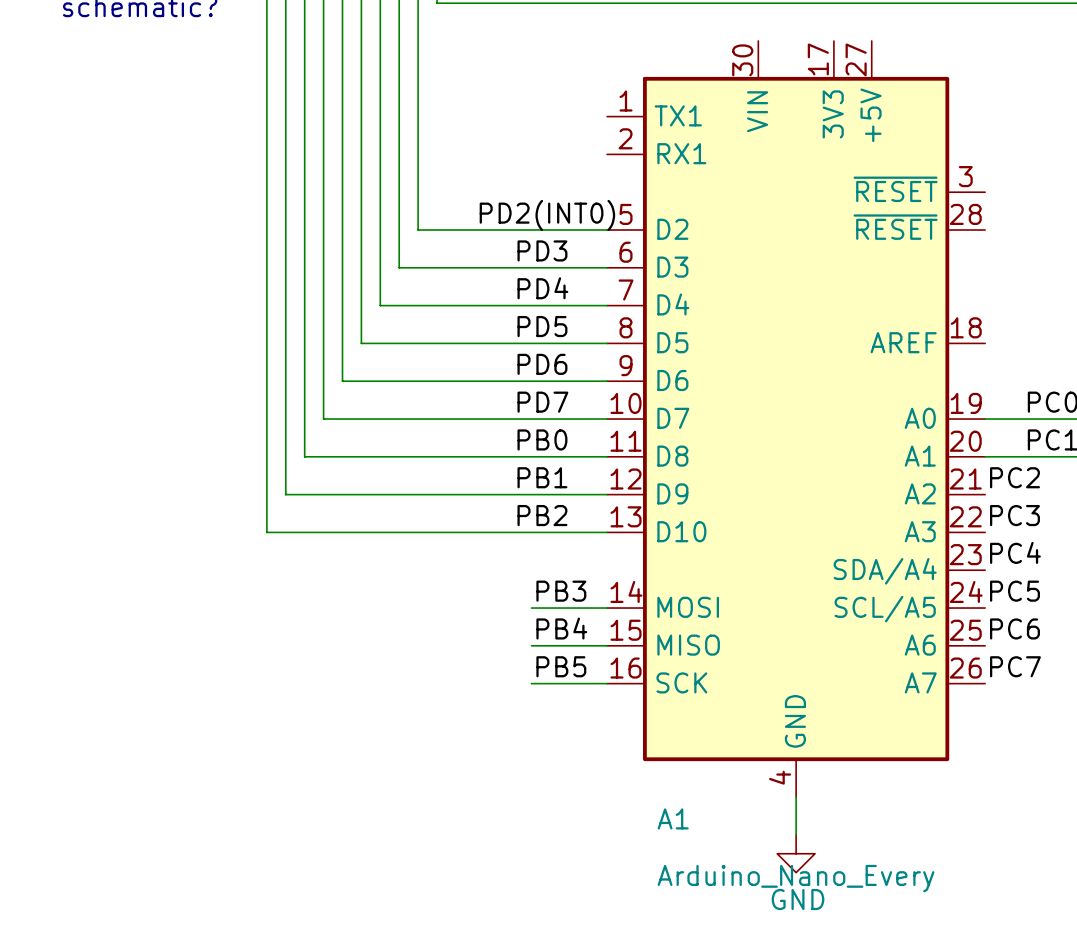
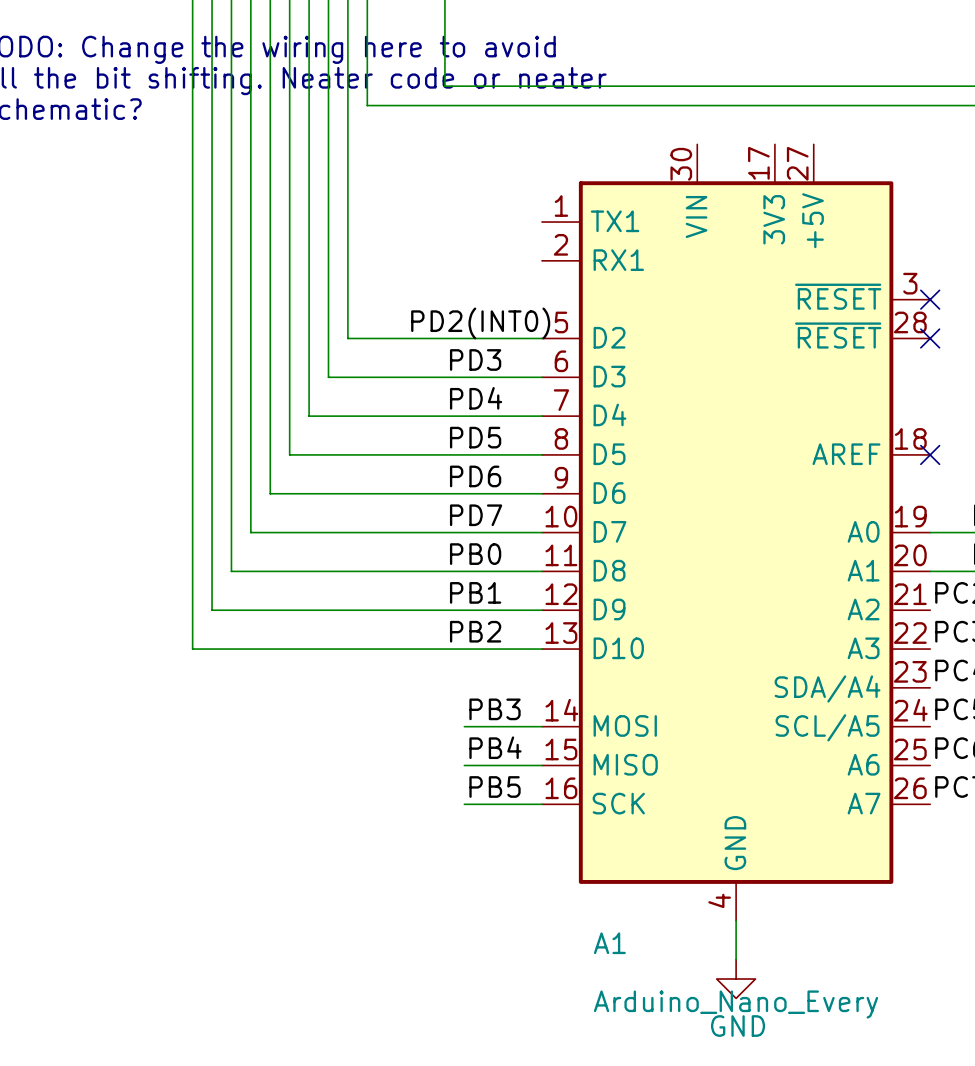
no-connect mark: none -> (930, 299)
no-connect mark: none -> (930, 338)
no-connect mark: none -> (930, 454)

